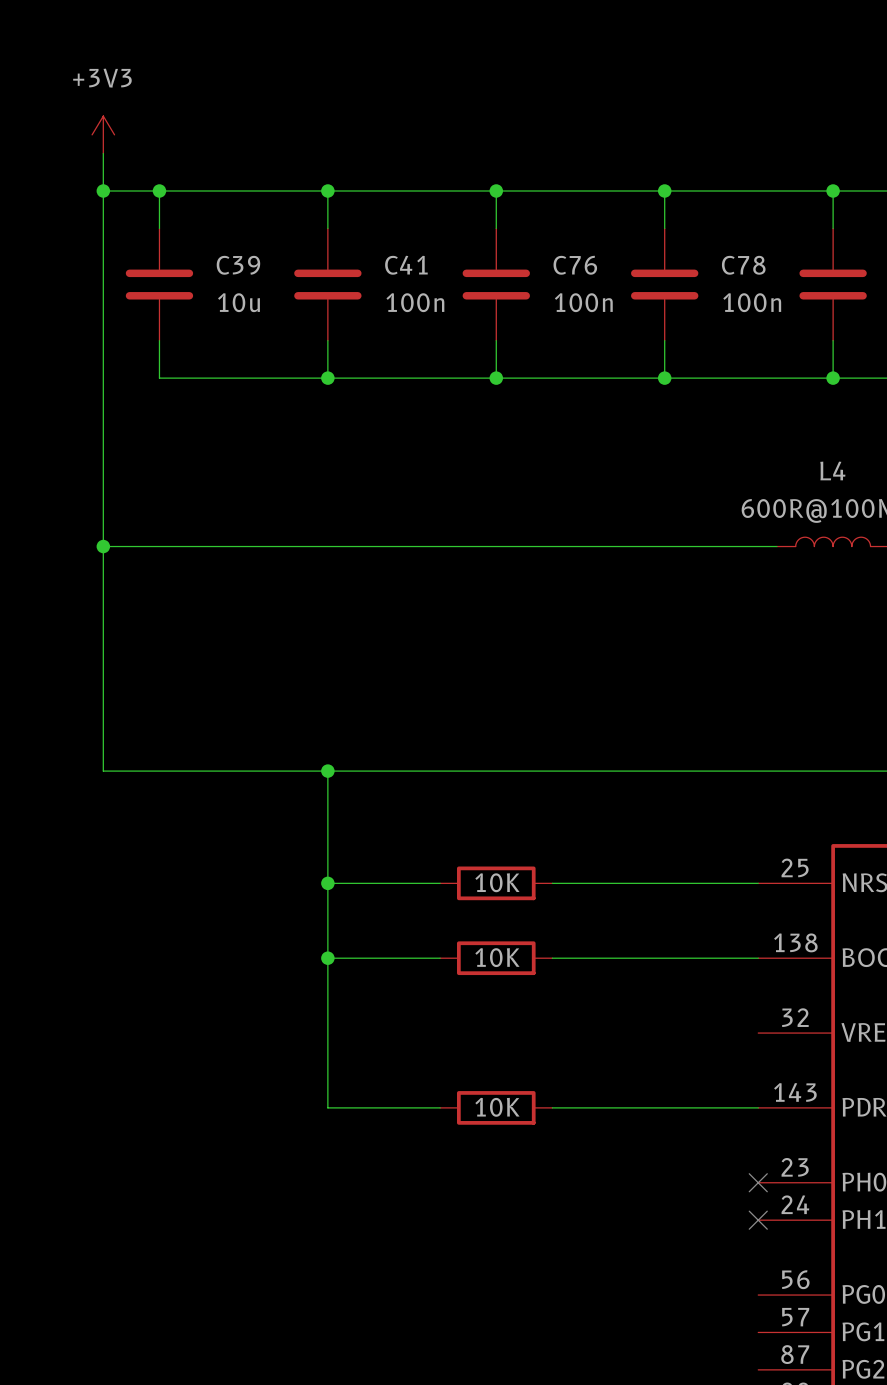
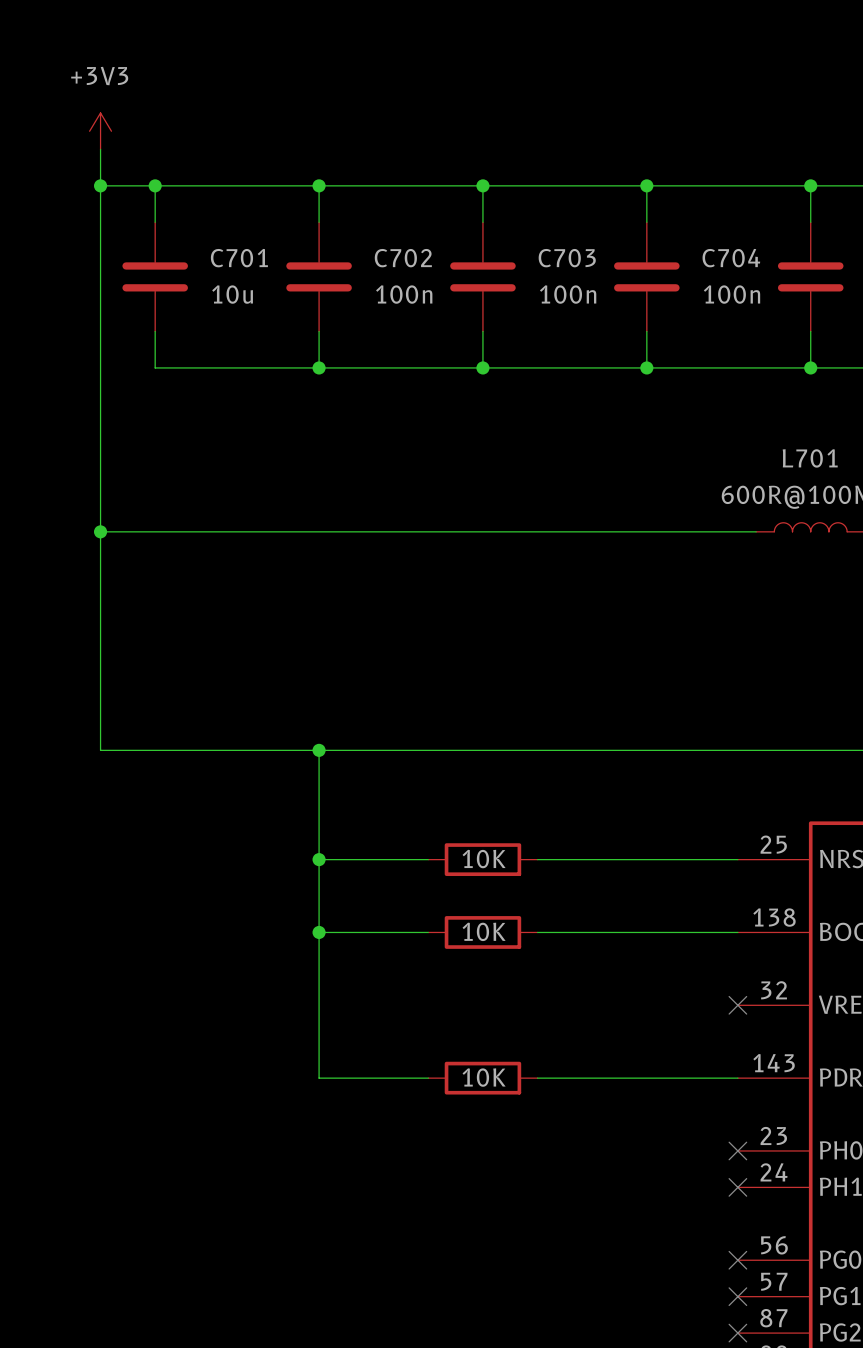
C39 name: C39 (238, 265) -> C701 (239, 258)
C41 name: C41 (406, 265) -> C702 (403, 258)
C76 name: C76 (575, 265) -> C703 (567, 258)
C78 name: C78 (743, 265) -> C704 (731, 258)
L4 name: L4 (832, 470) -> L701 (810, 458)
no-connect mark: none -> (737, 1005)
no-connect mark: none -> (737, 1260)
no-connect mark: none -> (737, 1296)
no-connect mark: none -> (737, 1333)

